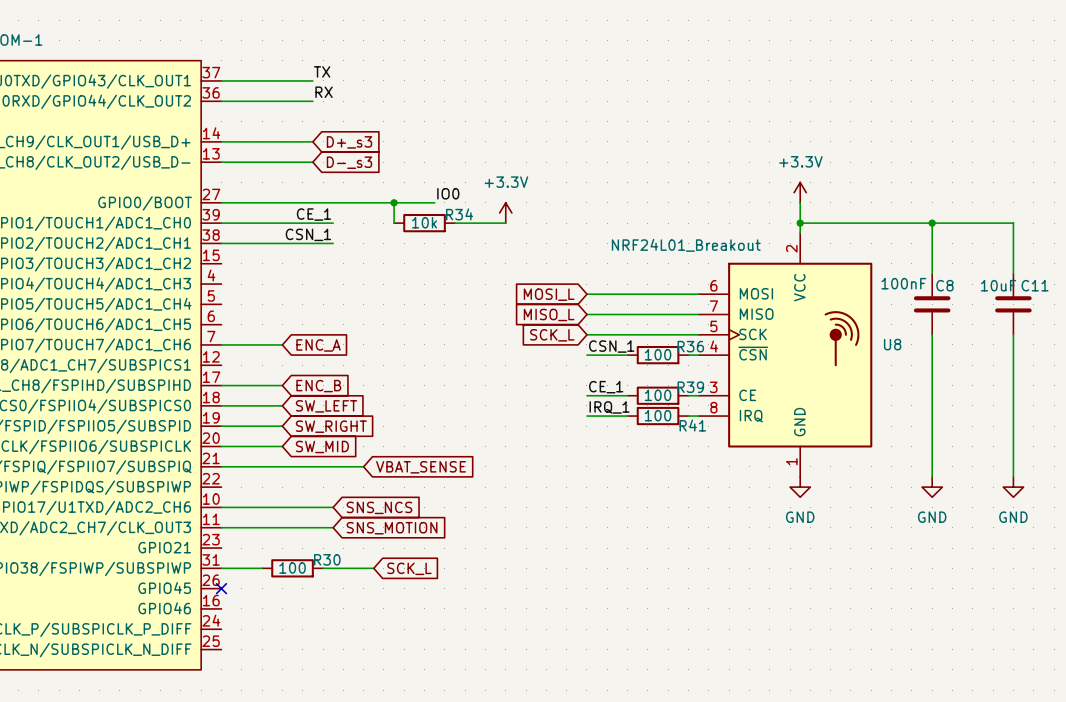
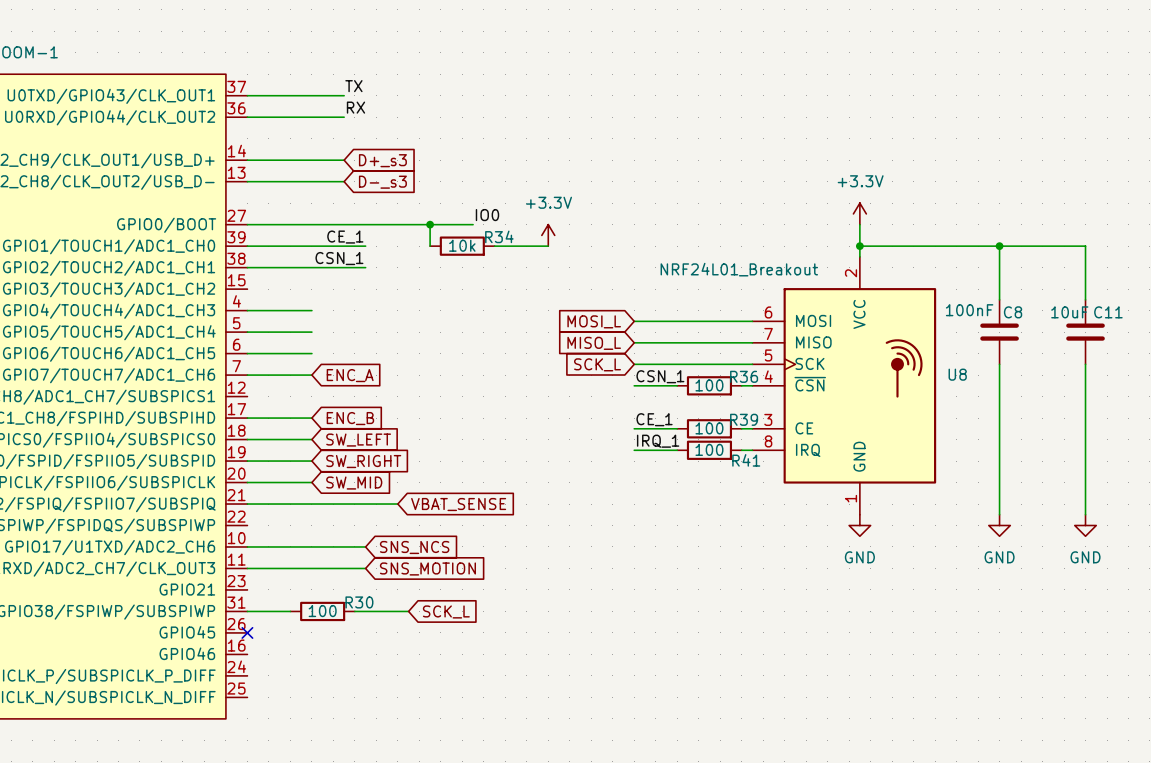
wire: none -> (247, 310) (311, 310)
wire: none -> (247, 332) (311, 332)
wire: none -> (247, 353) (311, 353)

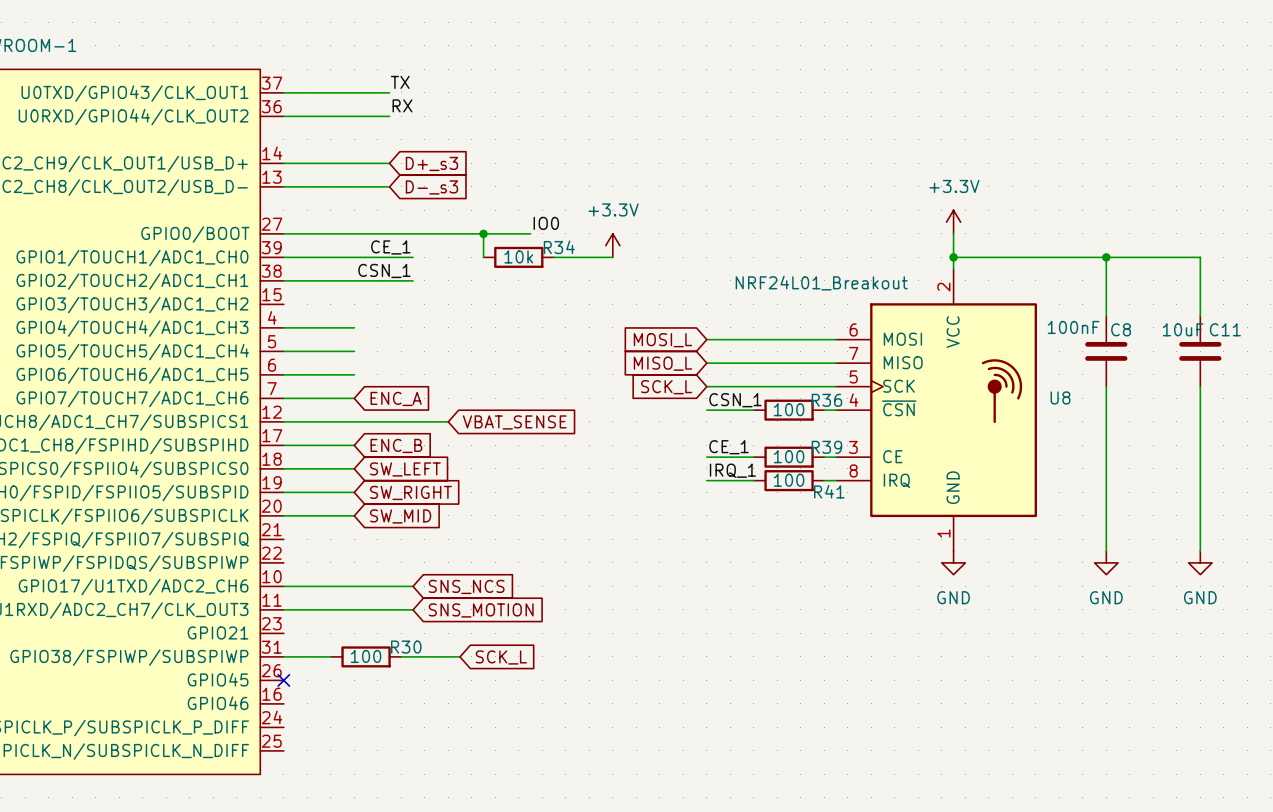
wire: (247, 504) (397, 504) -> (283, 421) (448, 421)
global label position: VBAT_SENSE (458, 504) -> VBAT_SENSE (514, 422)

